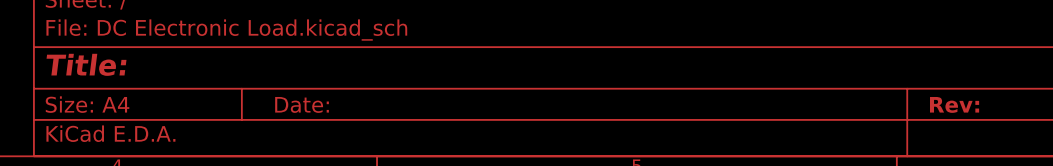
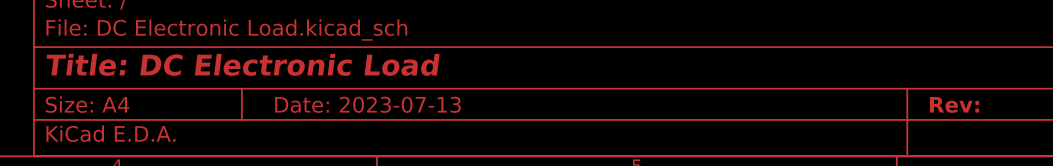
title block: Title: (86, 64) -> Title: DC Electronic Load (243, 64)
title block: Date: (302, 104) -> Date: 2023-07-13 (367, 104)

